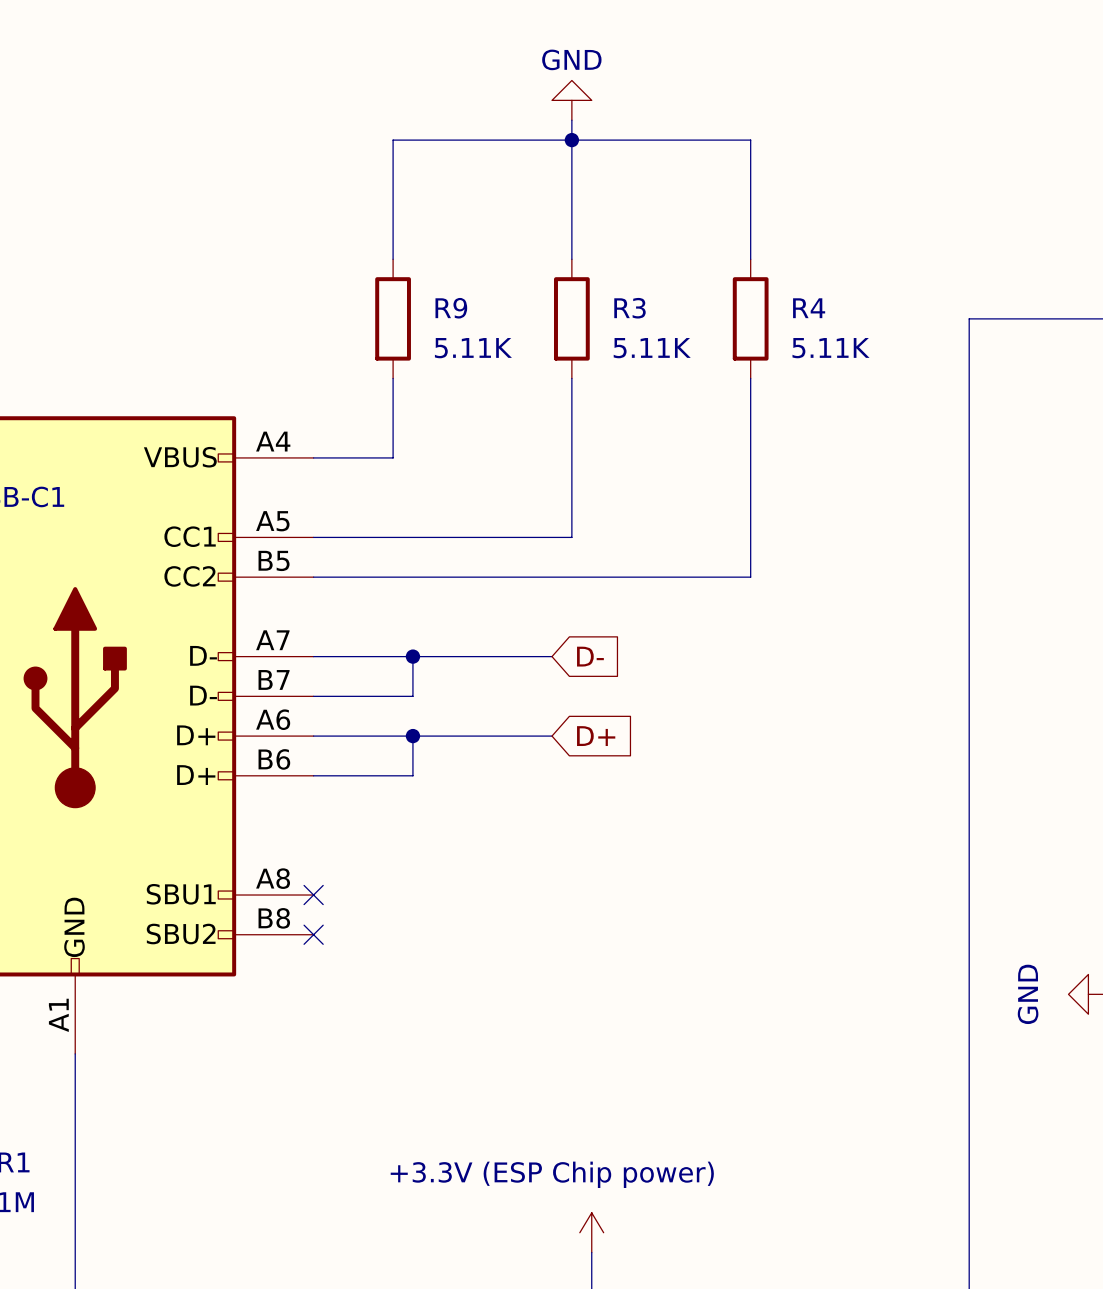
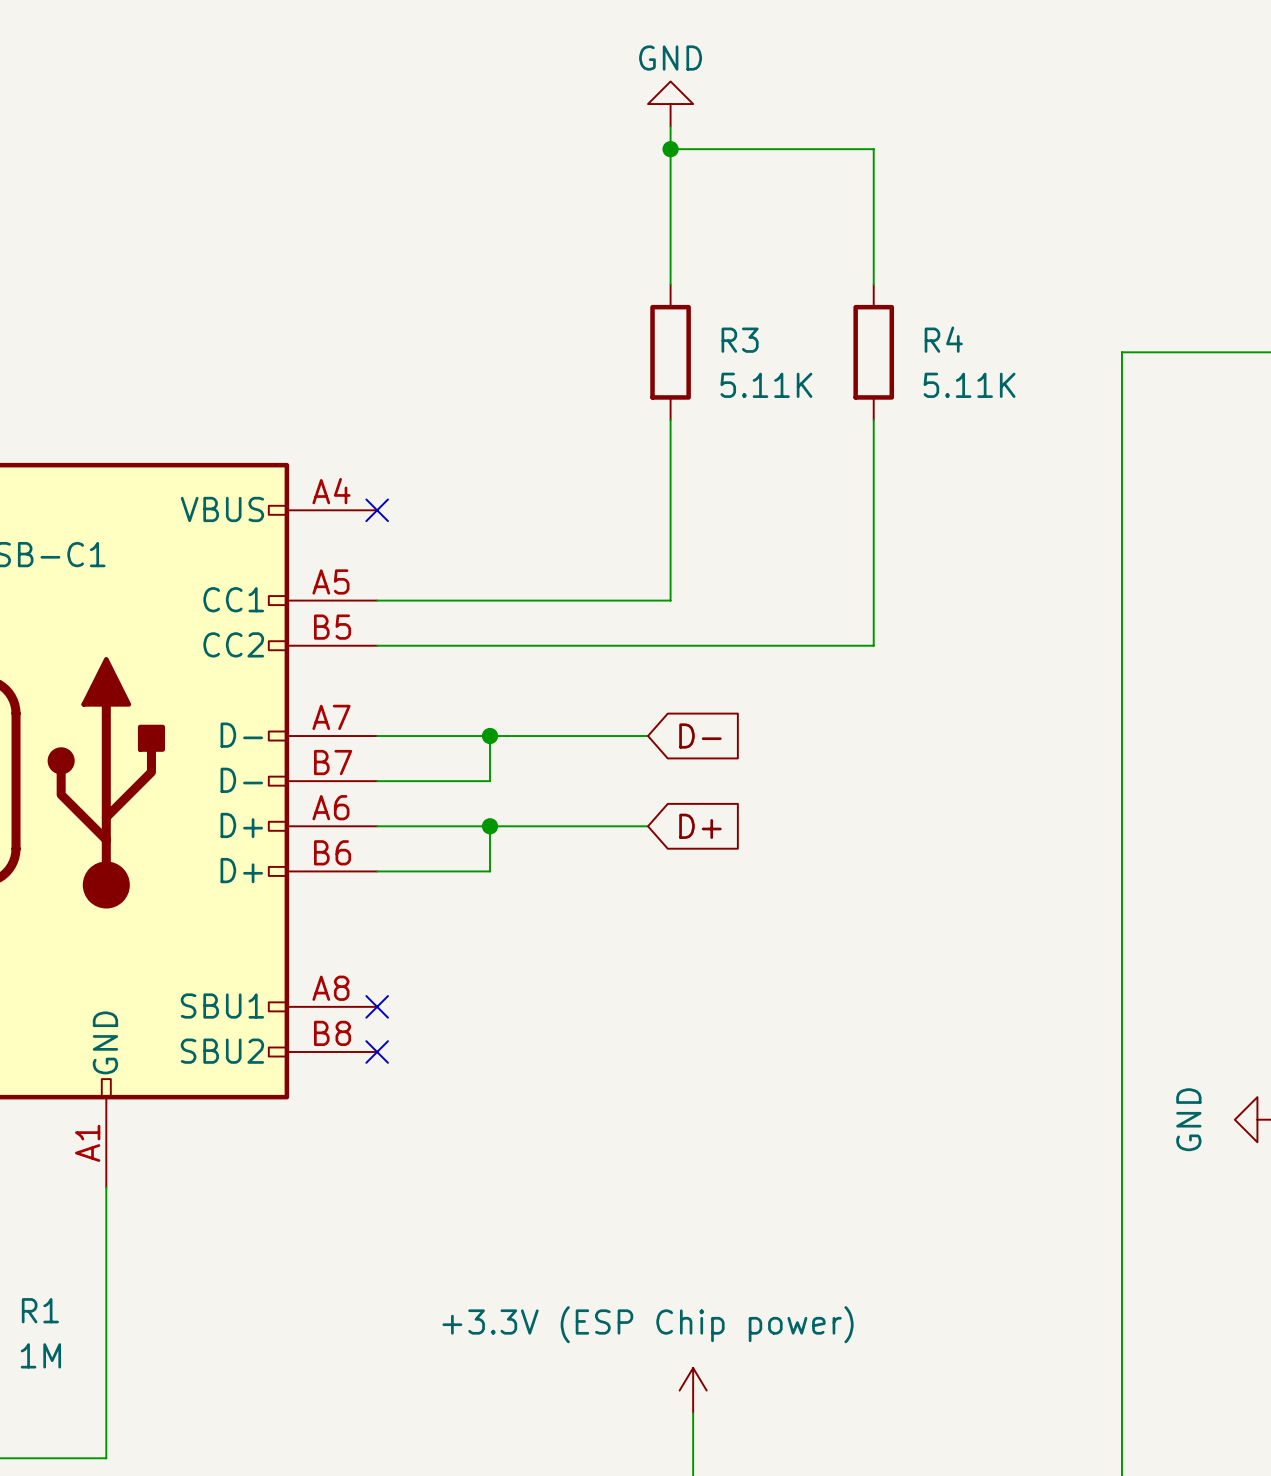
wire: (571, 140) (393, 140) (393, 259) -> none
R9: 5.11K (393, 318) -> none
wire: (393, 378) (393, 457) (313, 457) -> none
no-connect mark: none -> (377, 510)

